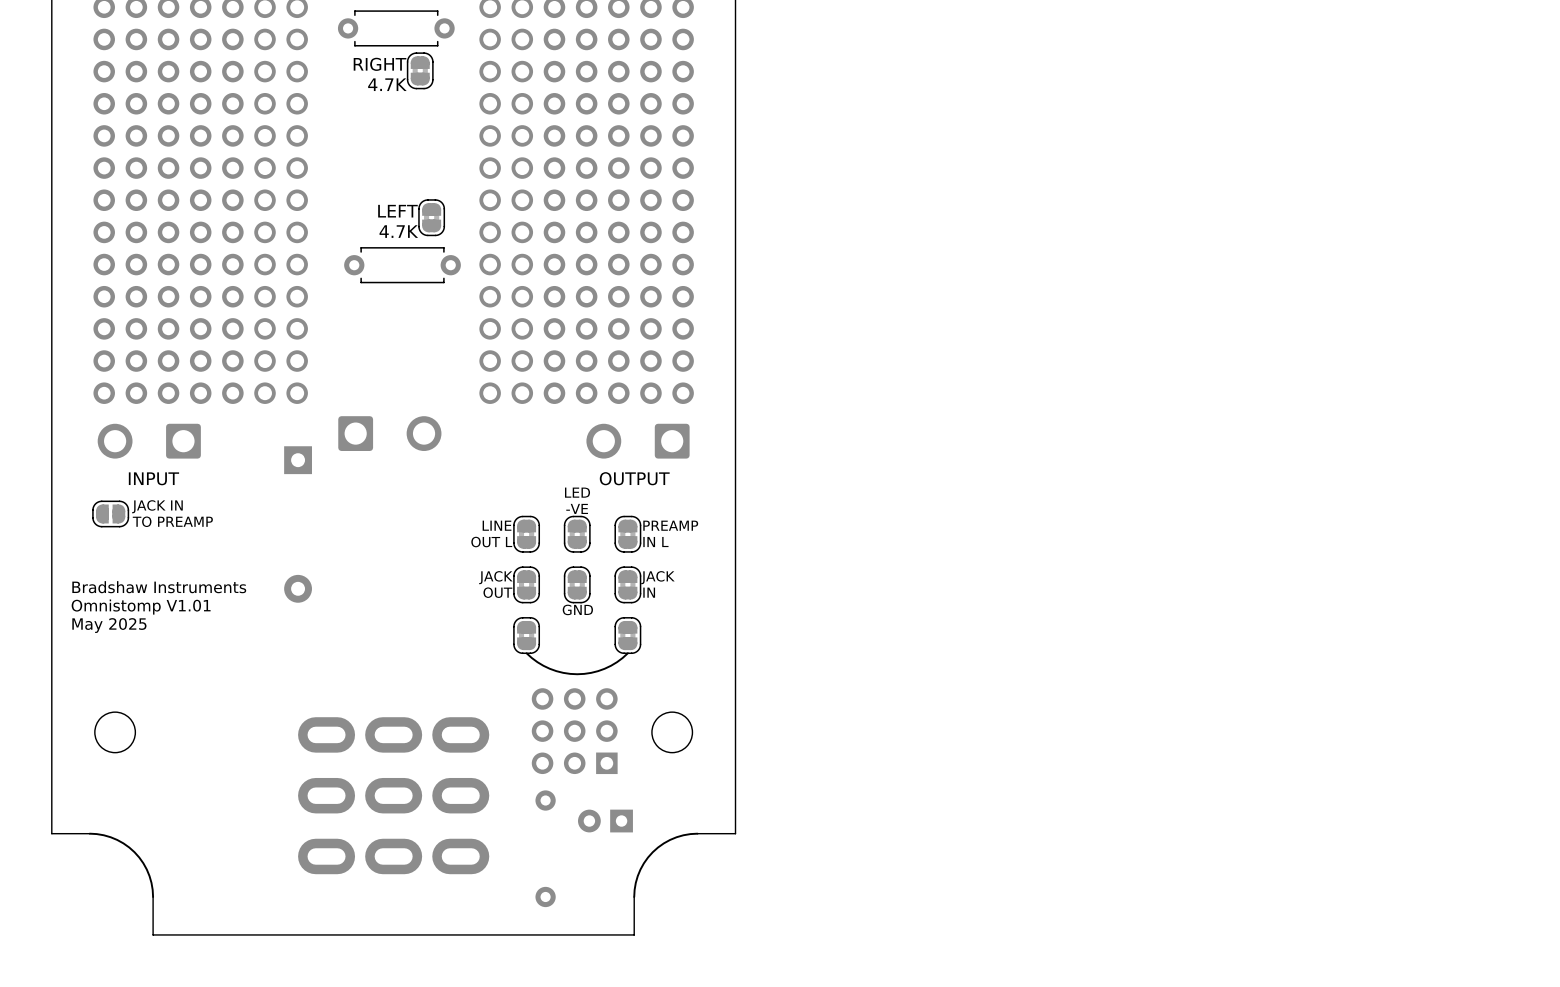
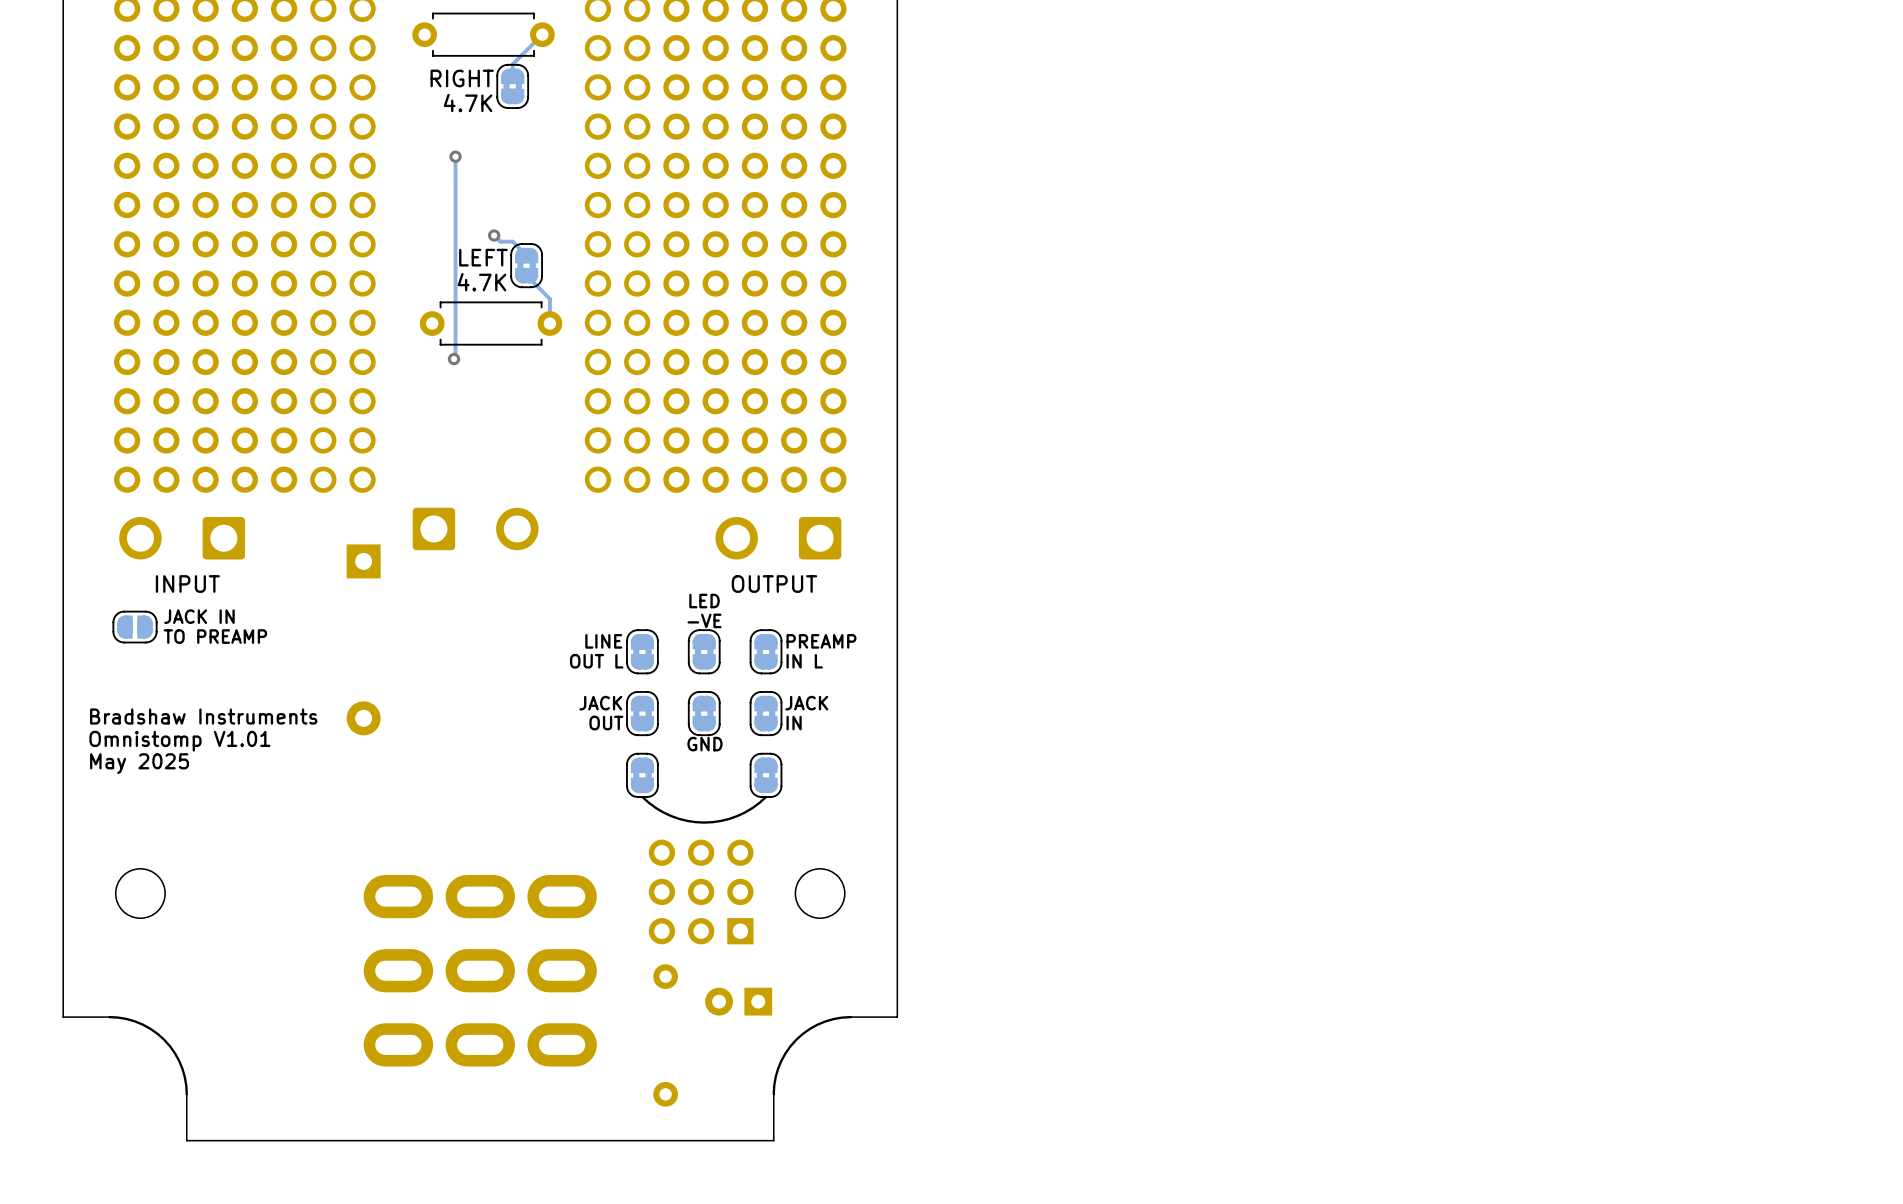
track: none -> (542, 34) (512, 64) (512, 76)
track: none -> (455, 156) (455, 357) (453, 359)
via: none -> (455, 156)
track: none -> (494, 235) (500, 241) (512, 241) (526, 255)
via: none -> (494, 235)
track: none -> (526, 275) (549, 298) (549, 323)
via: none -> (453, 359)

